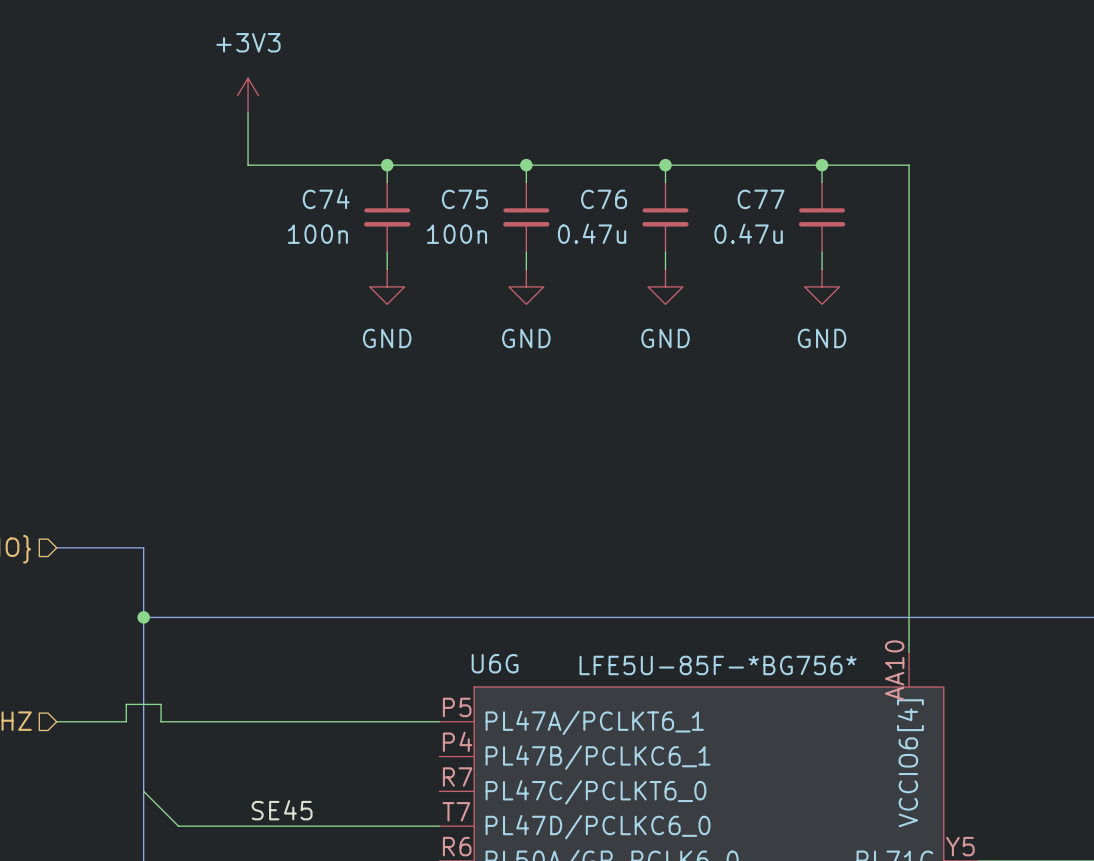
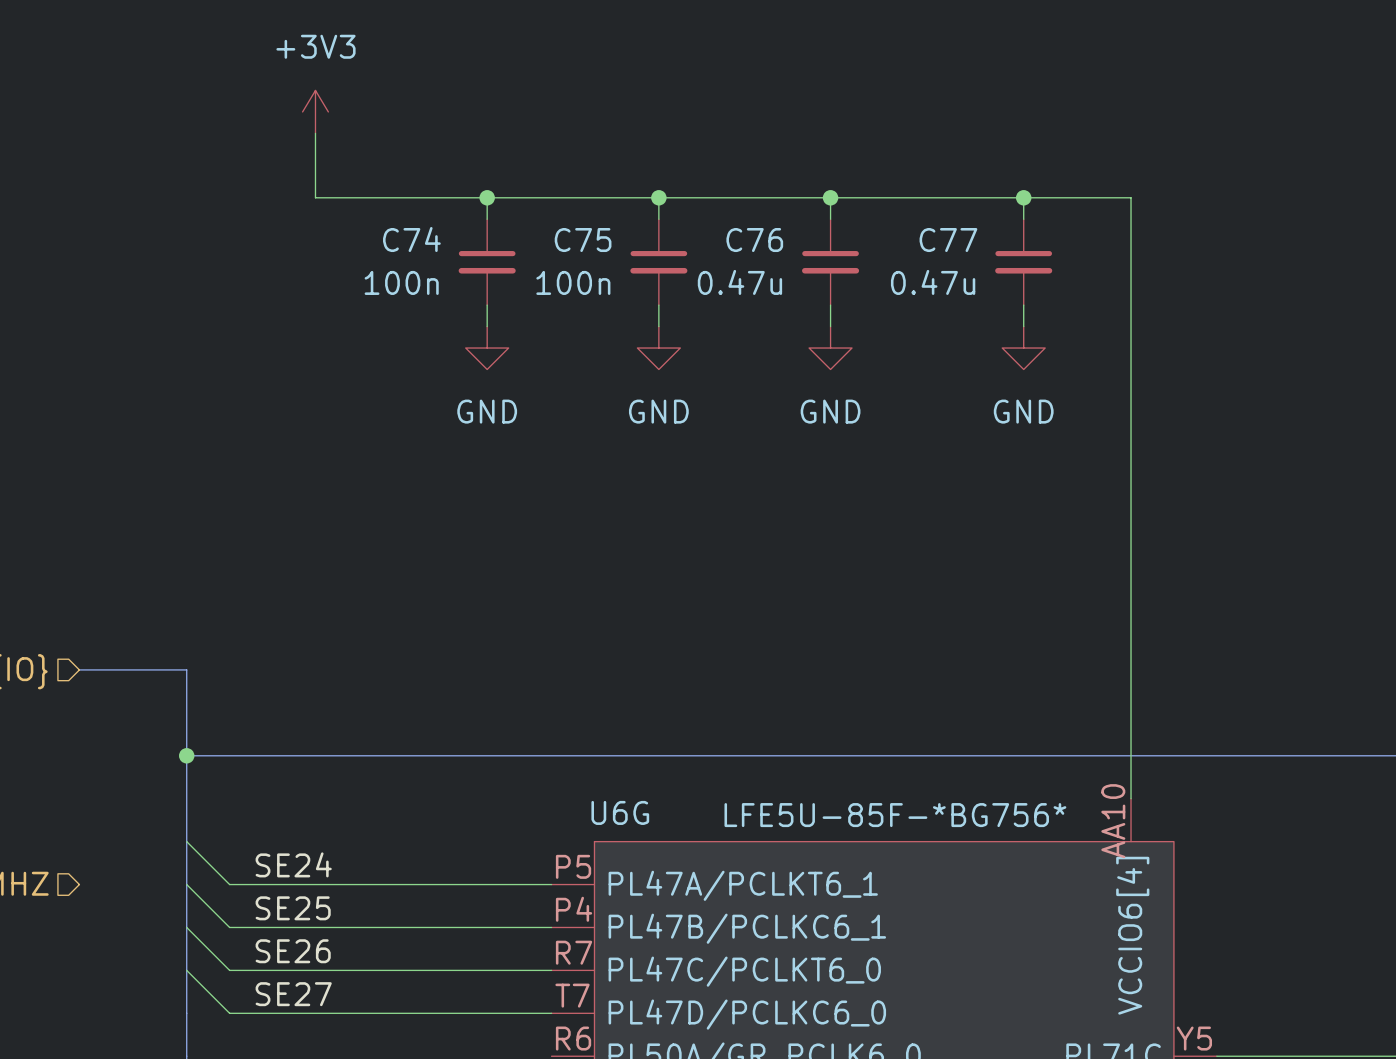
label: none -> SE24 (293, 864)
wire: (56, 721) (126, 721) (126, 704) (161, 704) (161, 721) (178, 721) -> (186, 841) (229, 884)
wire: none -> (186, 884) (229, 927) (551, 927)
label: none -> SE25 (293, 908)
wire: none -> (186, 927) (229, 970) (551, 970)
label: none -> SE26 (293, 951)
label: none -> SE27 (293, 994)
label: SE45 (282, 810) -> none

